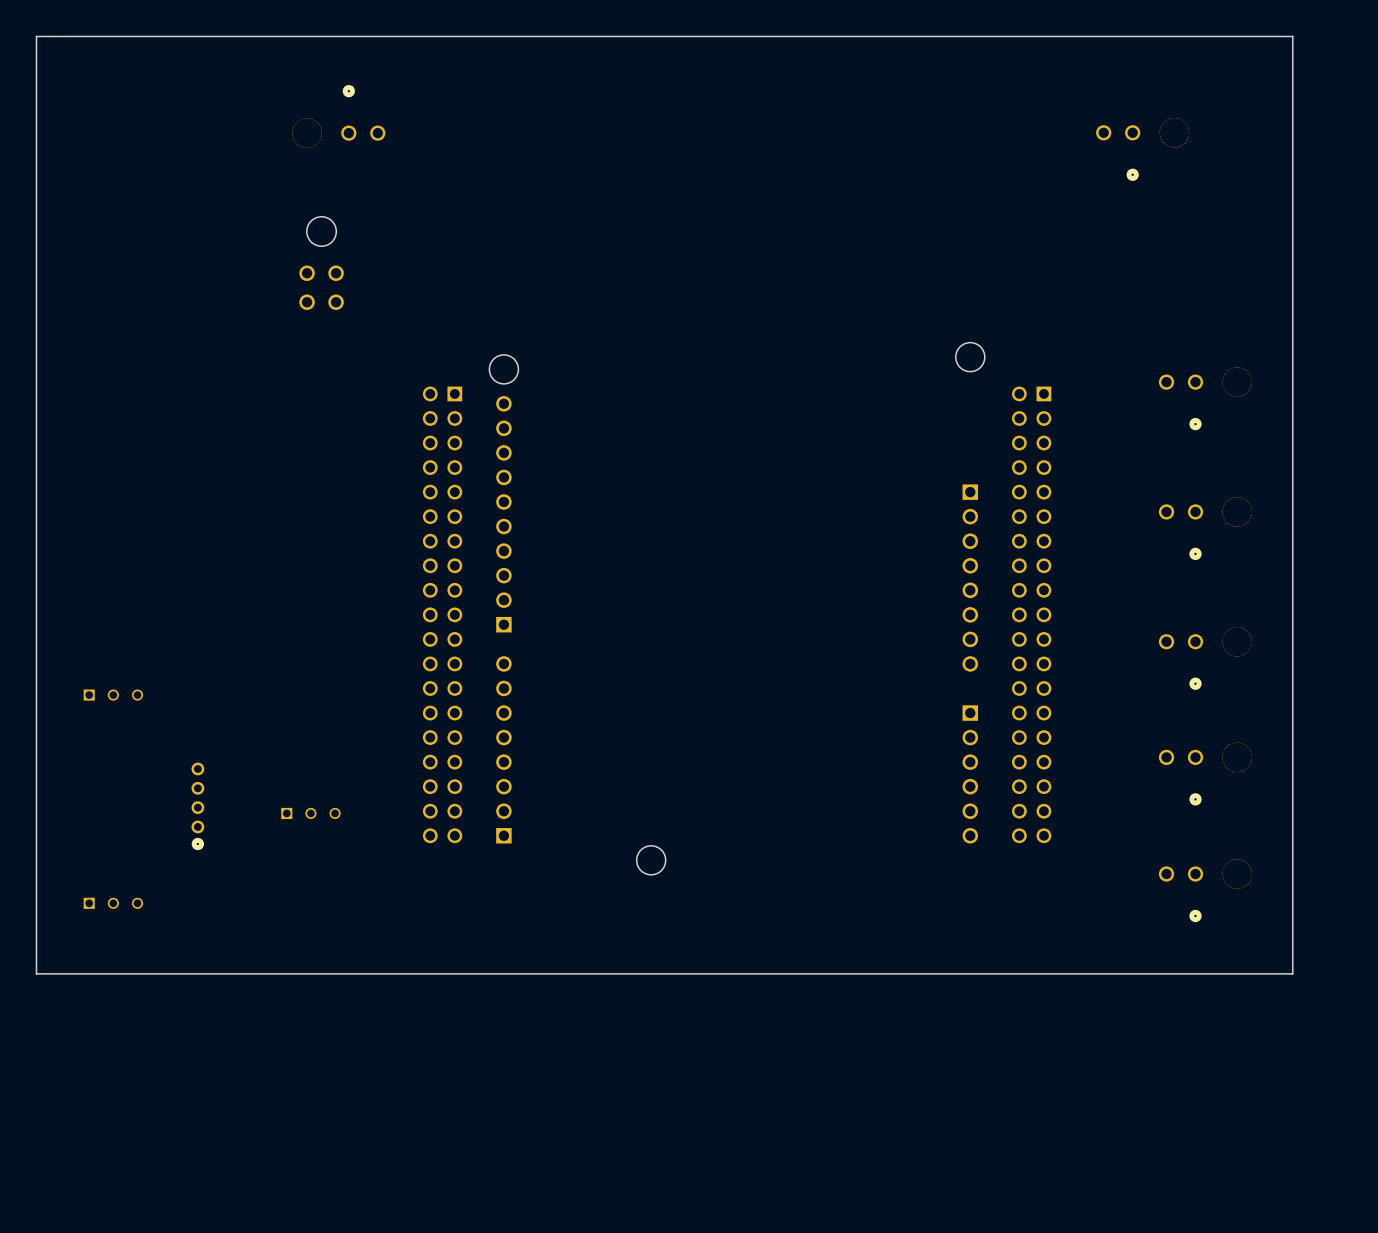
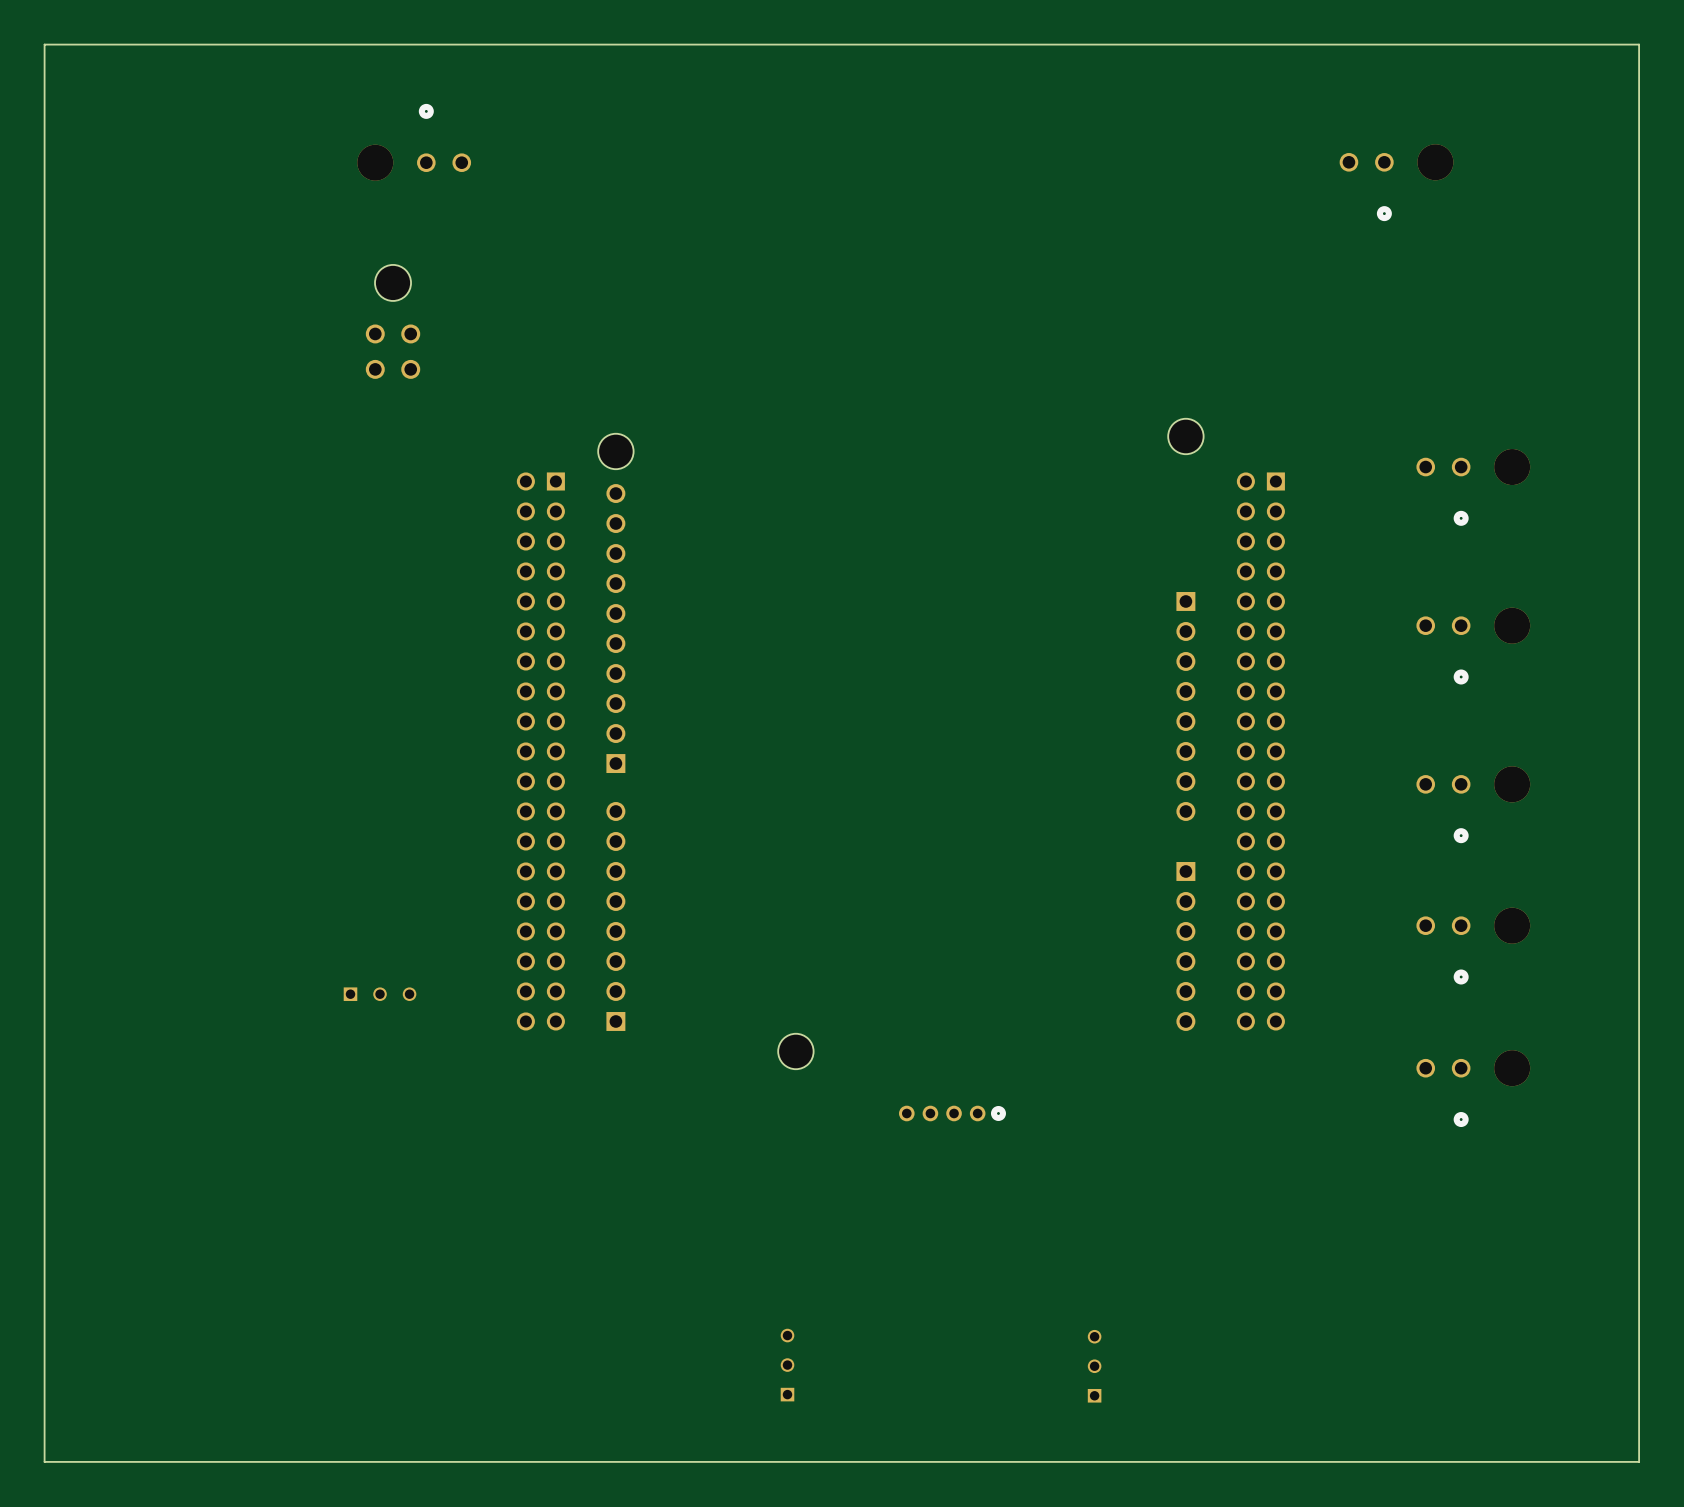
board edge: (1292, 36) (1292, 973) (36, 973) -> (1580, 44) (1639, 44) (1639, 1461) (44, 1461) (44, 1190)
part: (113, 695) -> none
part: (197, 806) -> none
part: (113, 903) -> none
part: none -> (952, 1113)
part: none -> (787, 1365)
part: none -> (1094, 1366)

